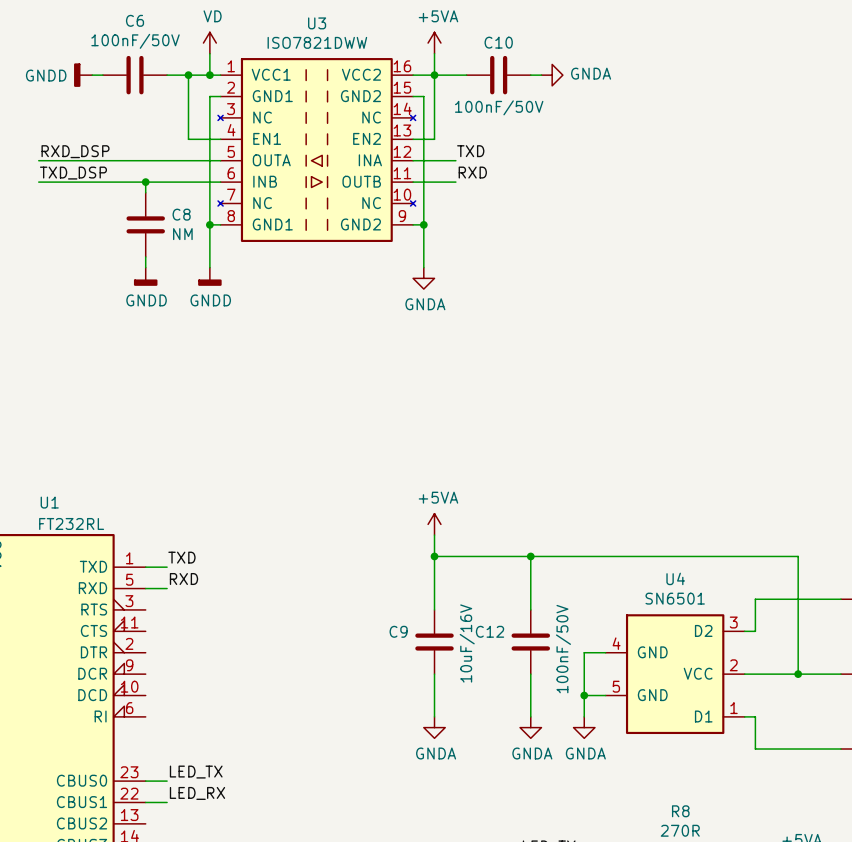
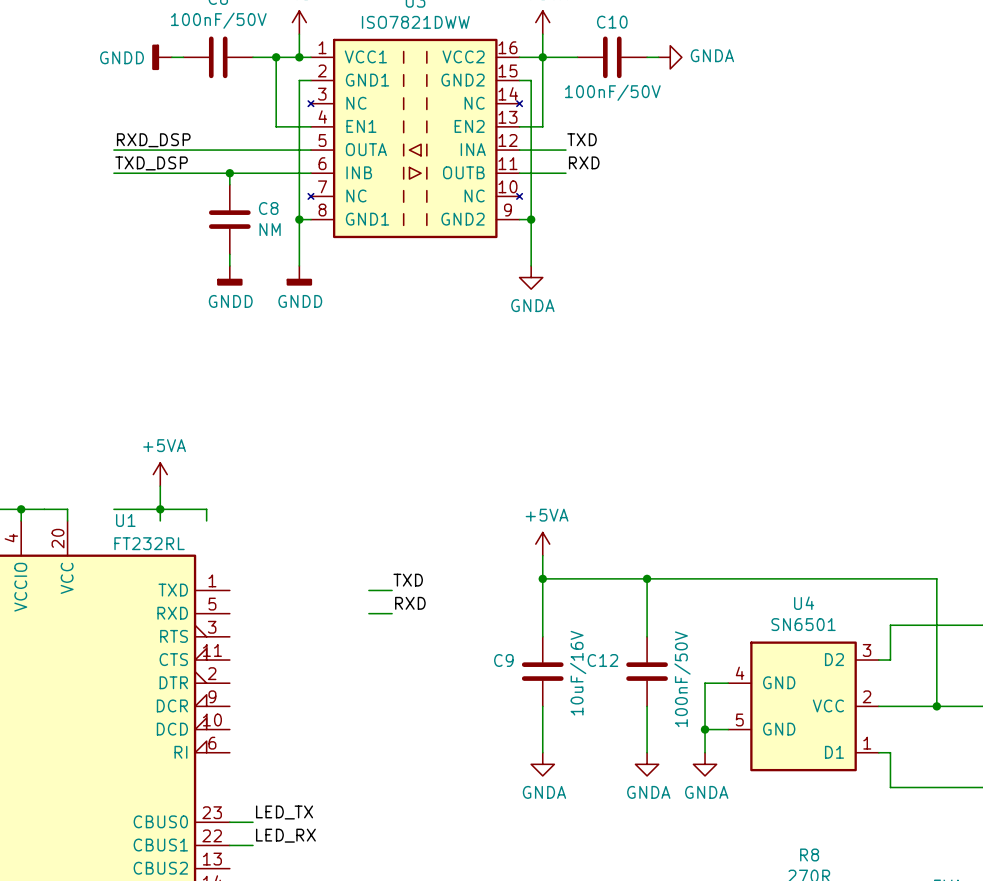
power symbol: none -> +5VA (160, 474)
wire: none -> (160, 486) (160, 520)
wire: none -> (113, 509) (206, 509) (206, 520)
junction: none -> (160, 509)
label position: TXD (181, 557) -> TXD (408, 580)
wire: (145, 567) (167, 567) -> (368, 590) (392, 590)
label position: RXD (183, 579) -> RXD (410, 603)
wire: (145, 588) (167, 588) -> (368, 613) (392, 613)

